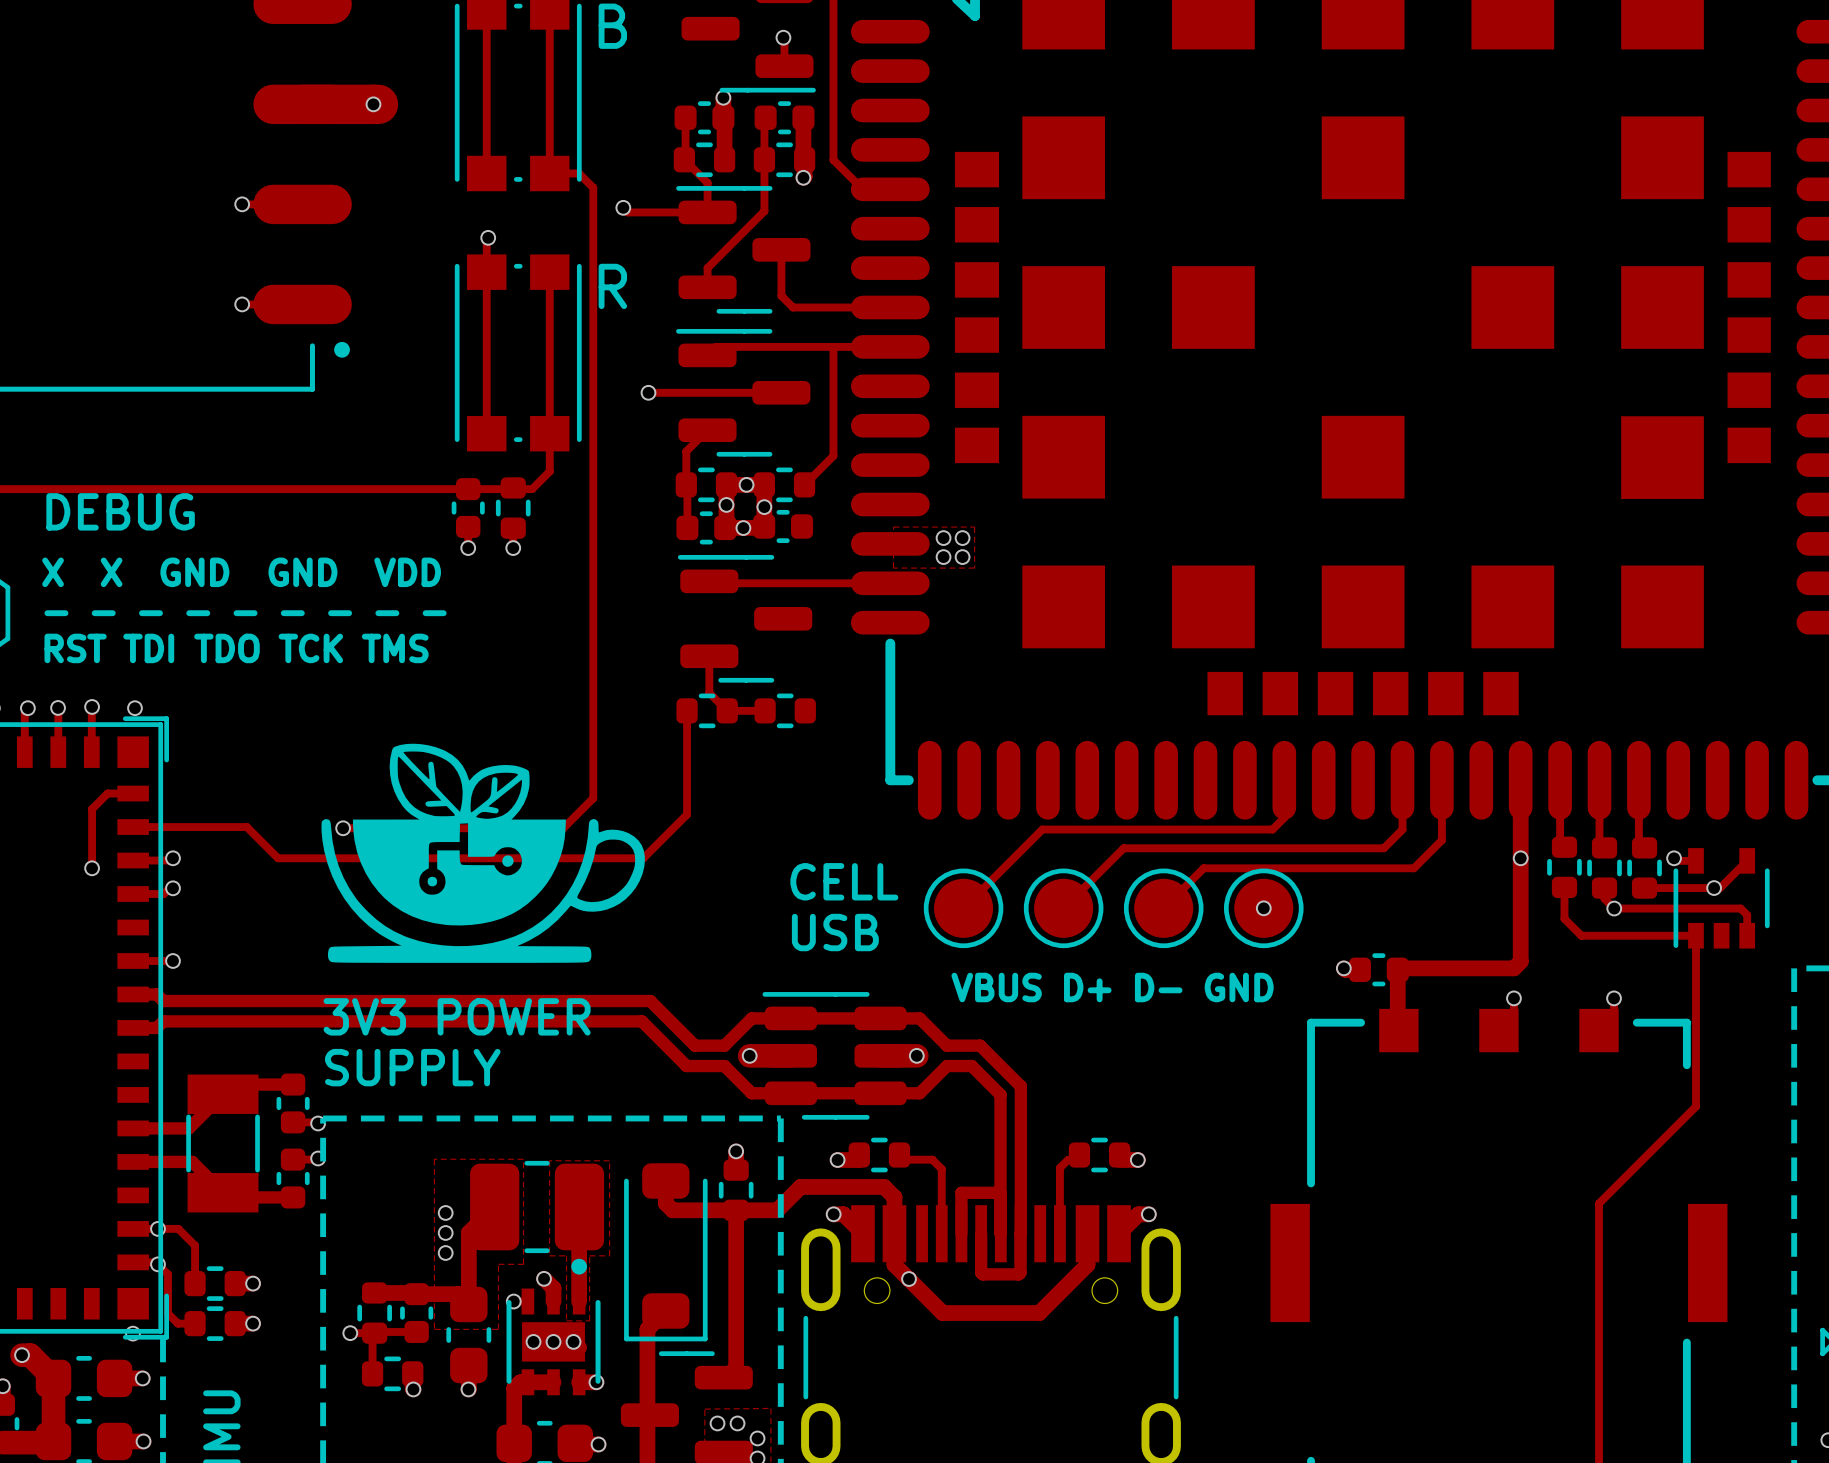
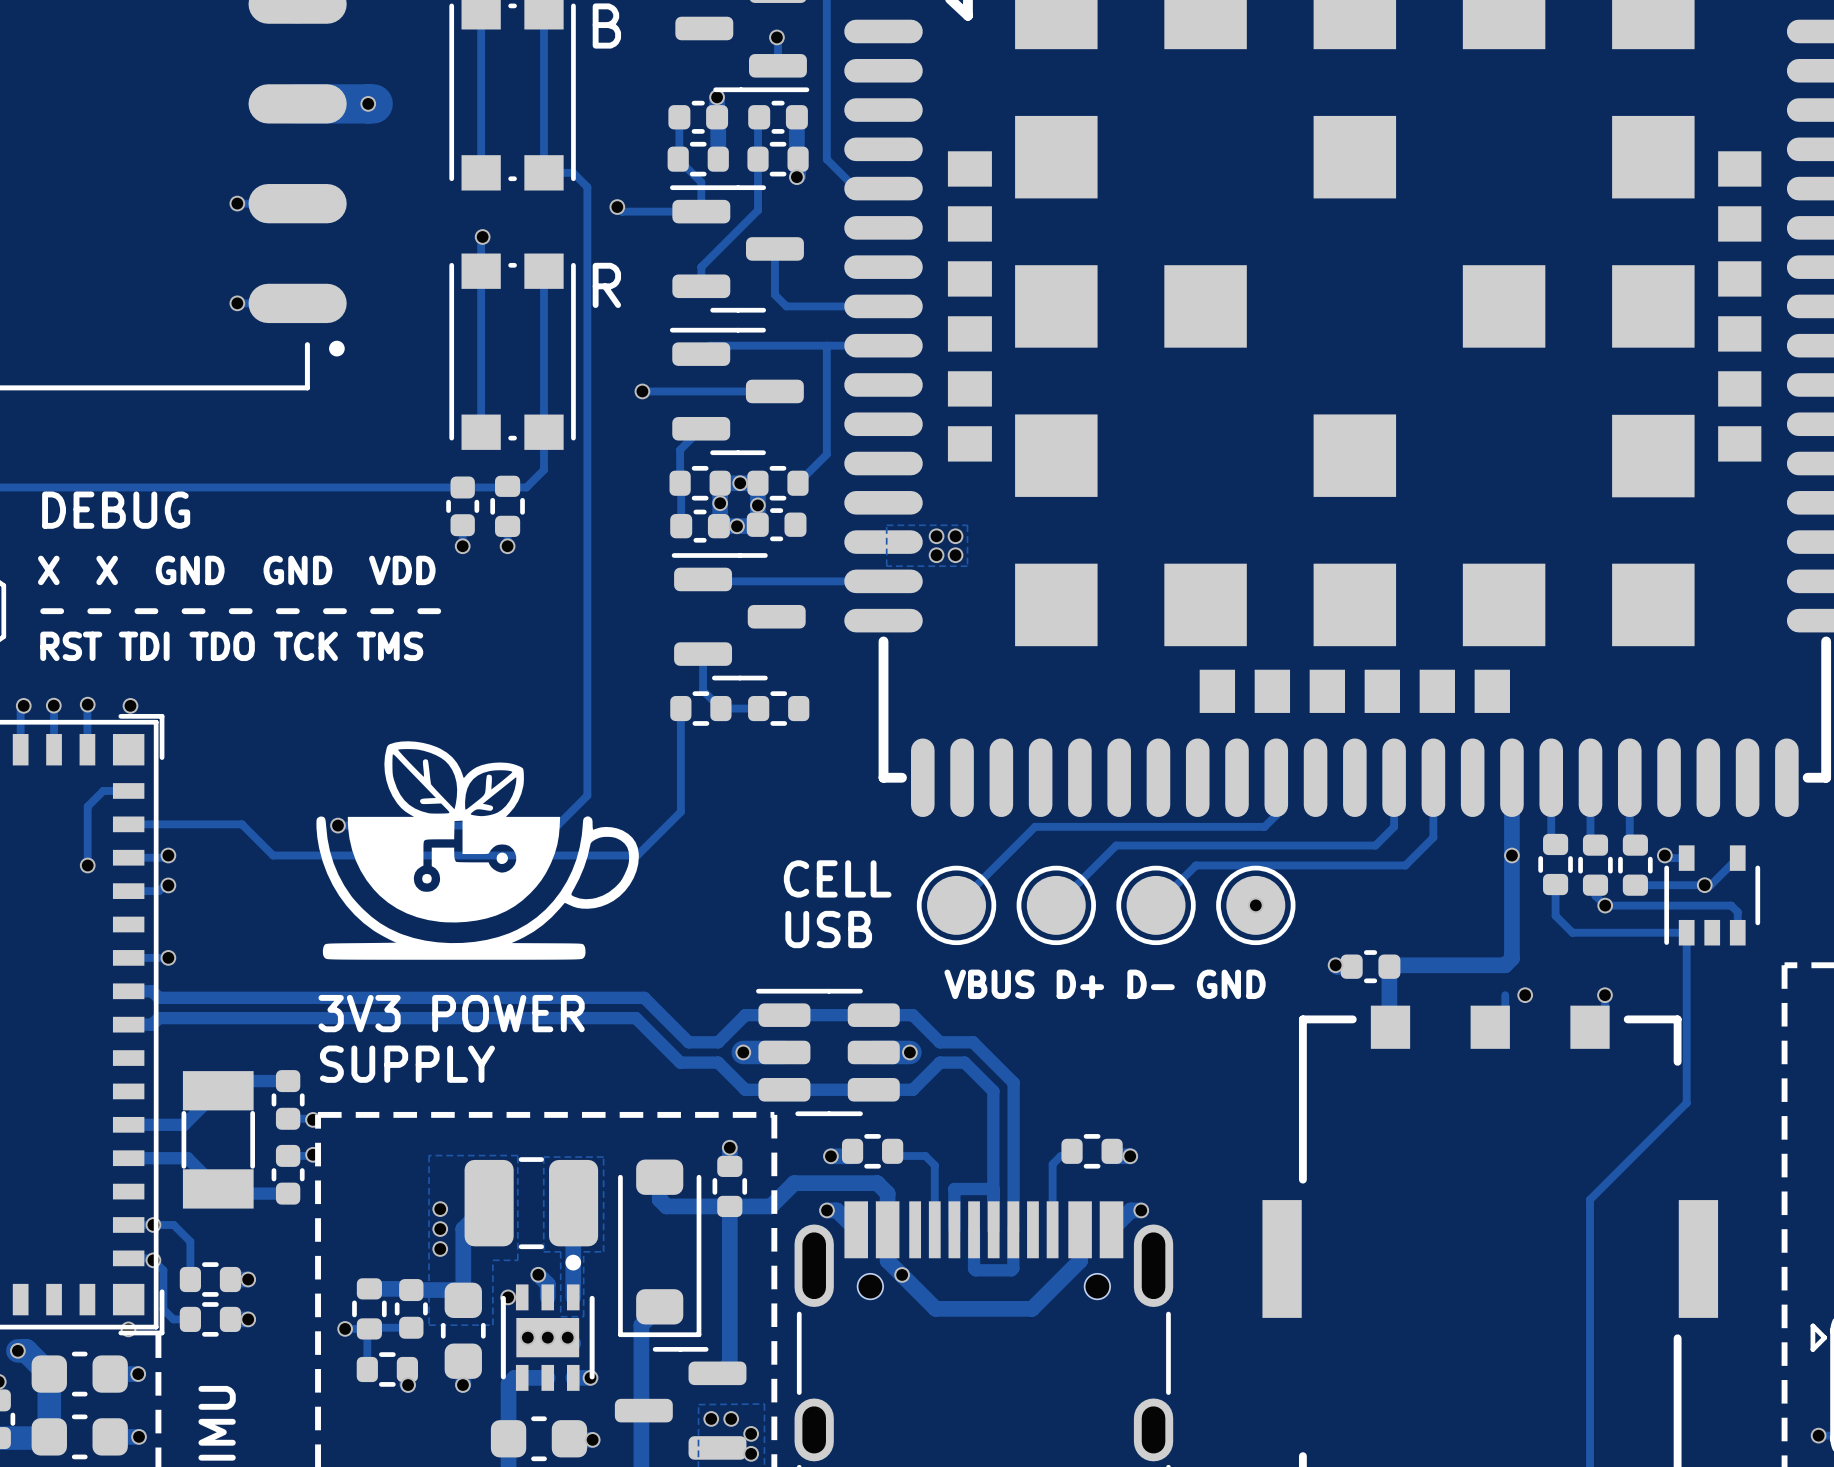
via position: (1513, 998) -> (1525, 995)

